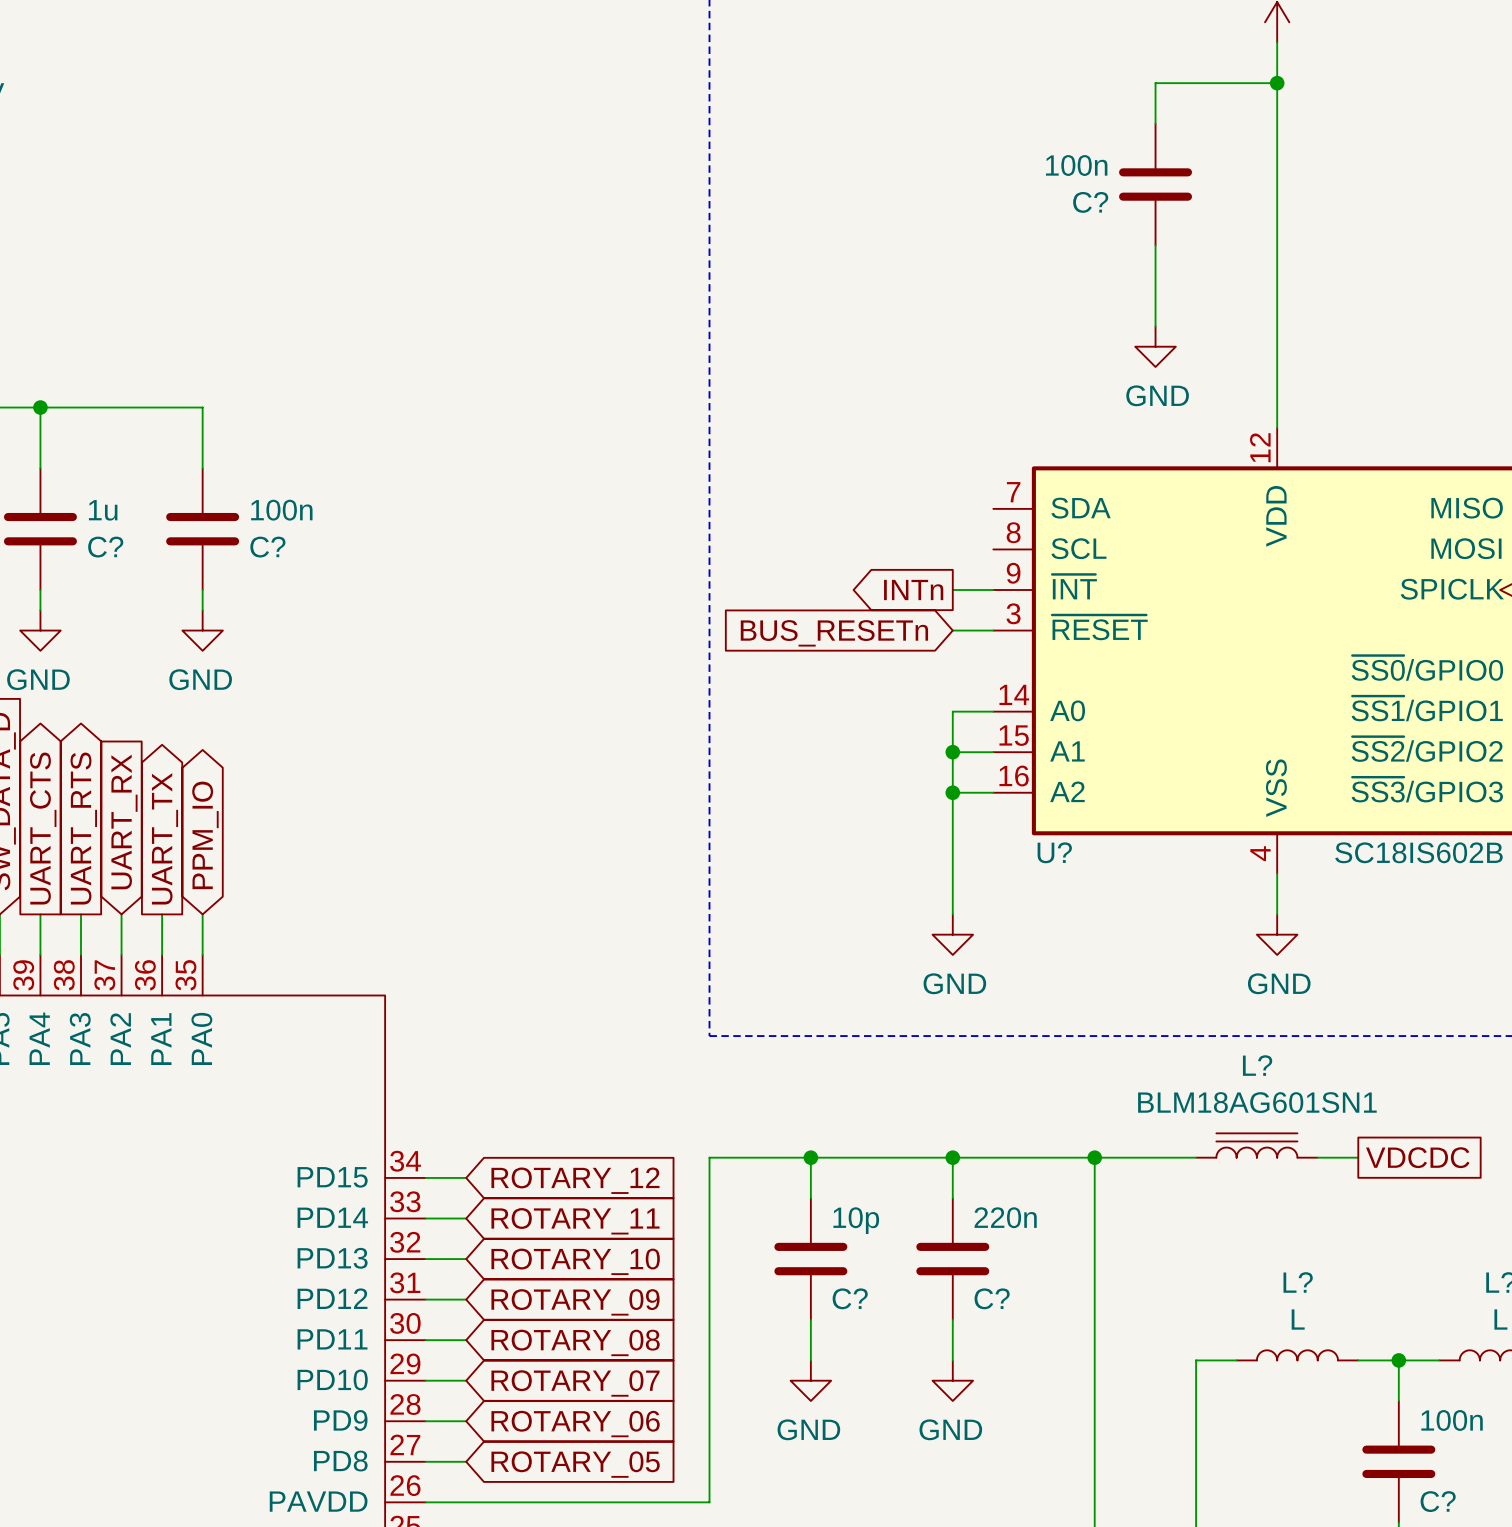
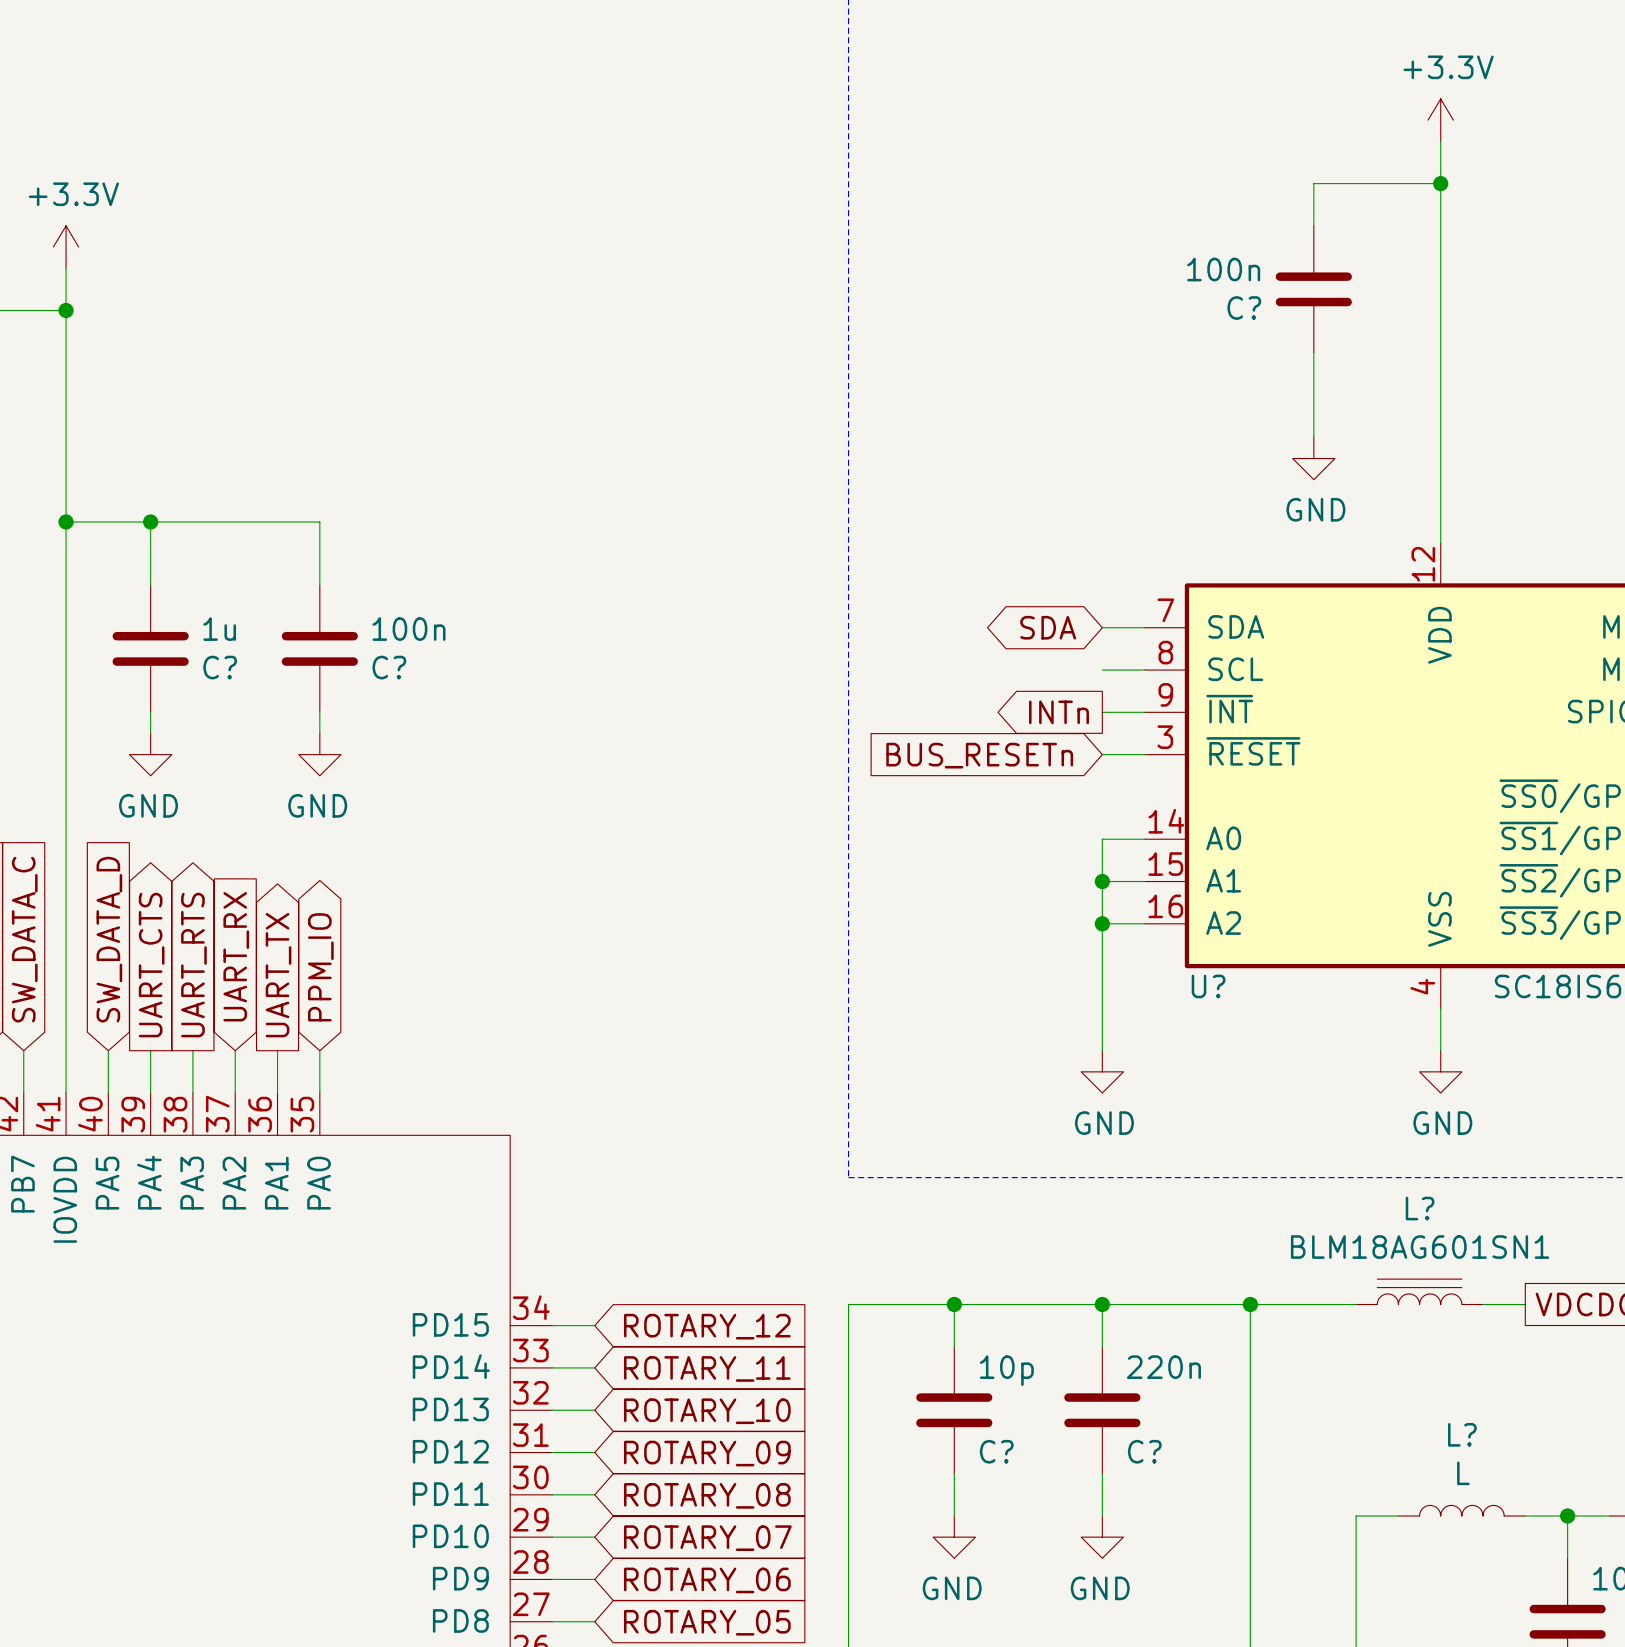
global label: none -> SDA (1048, 627)
wire: none -> (1102, 627) (1144, 627)
wire: none -> (1102, 670) (1144, 670)

